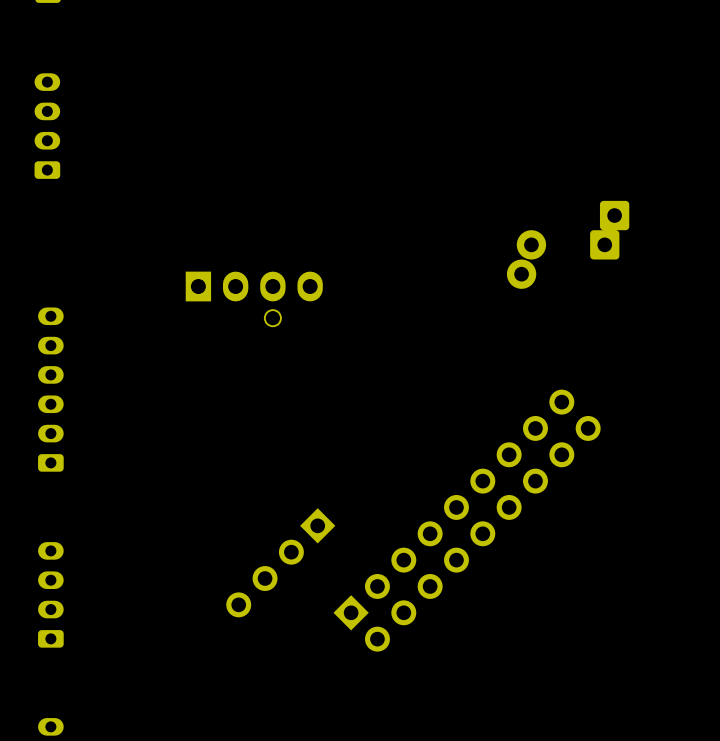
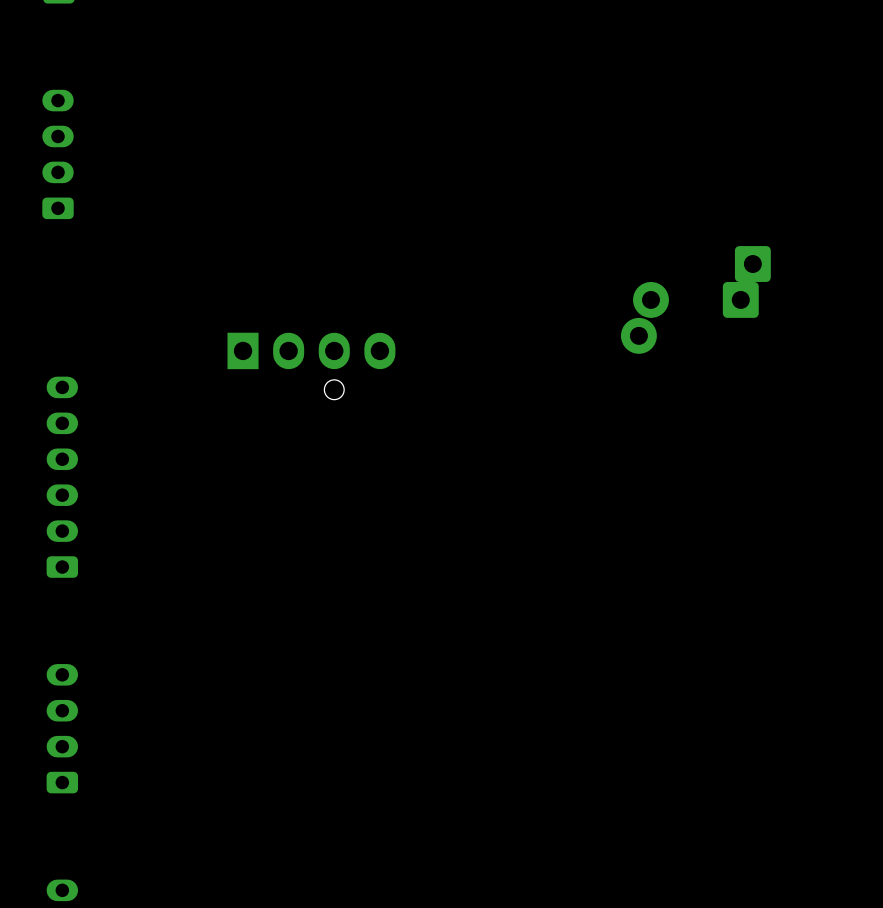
part: (467, 520) -> none
part: (280, 562) -> none

